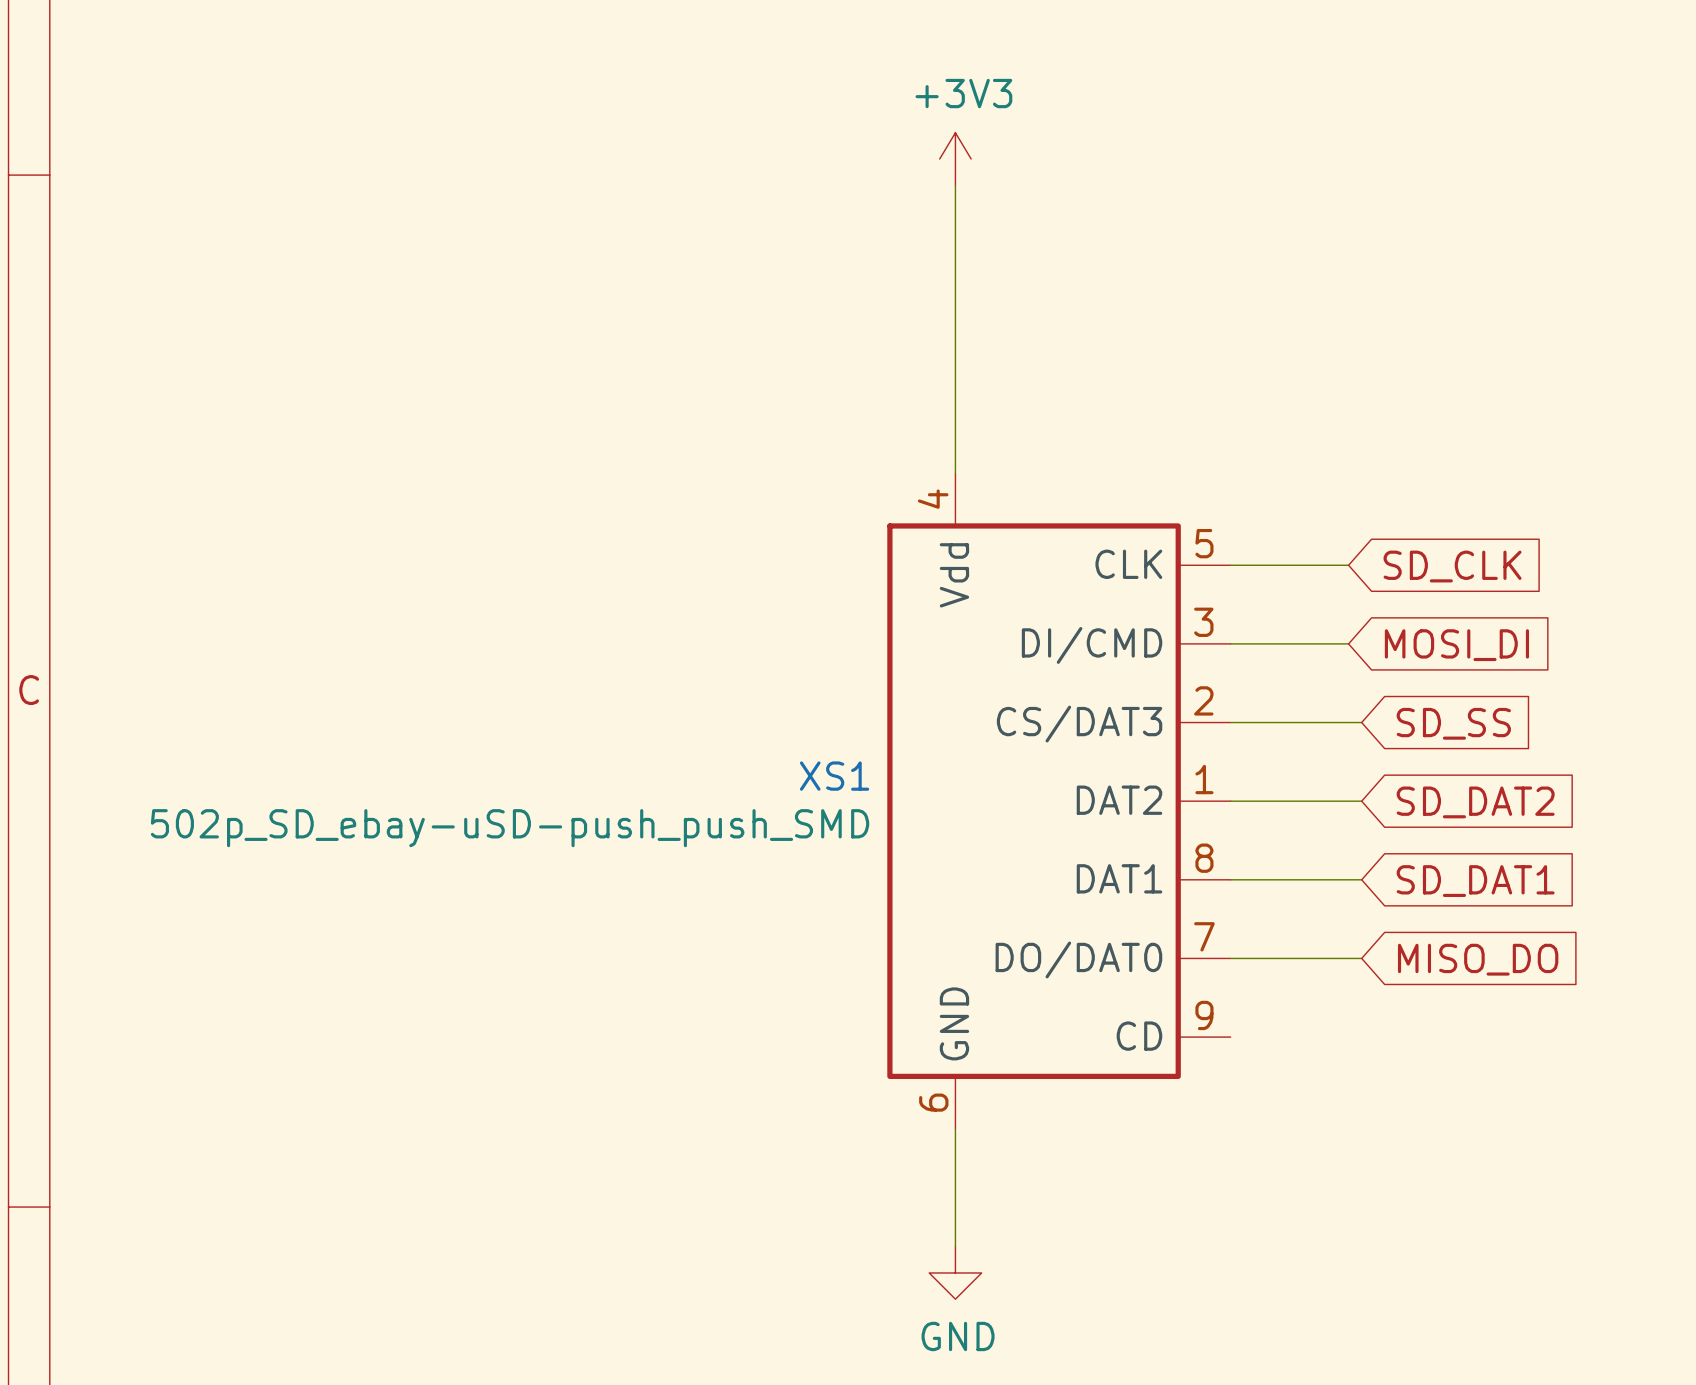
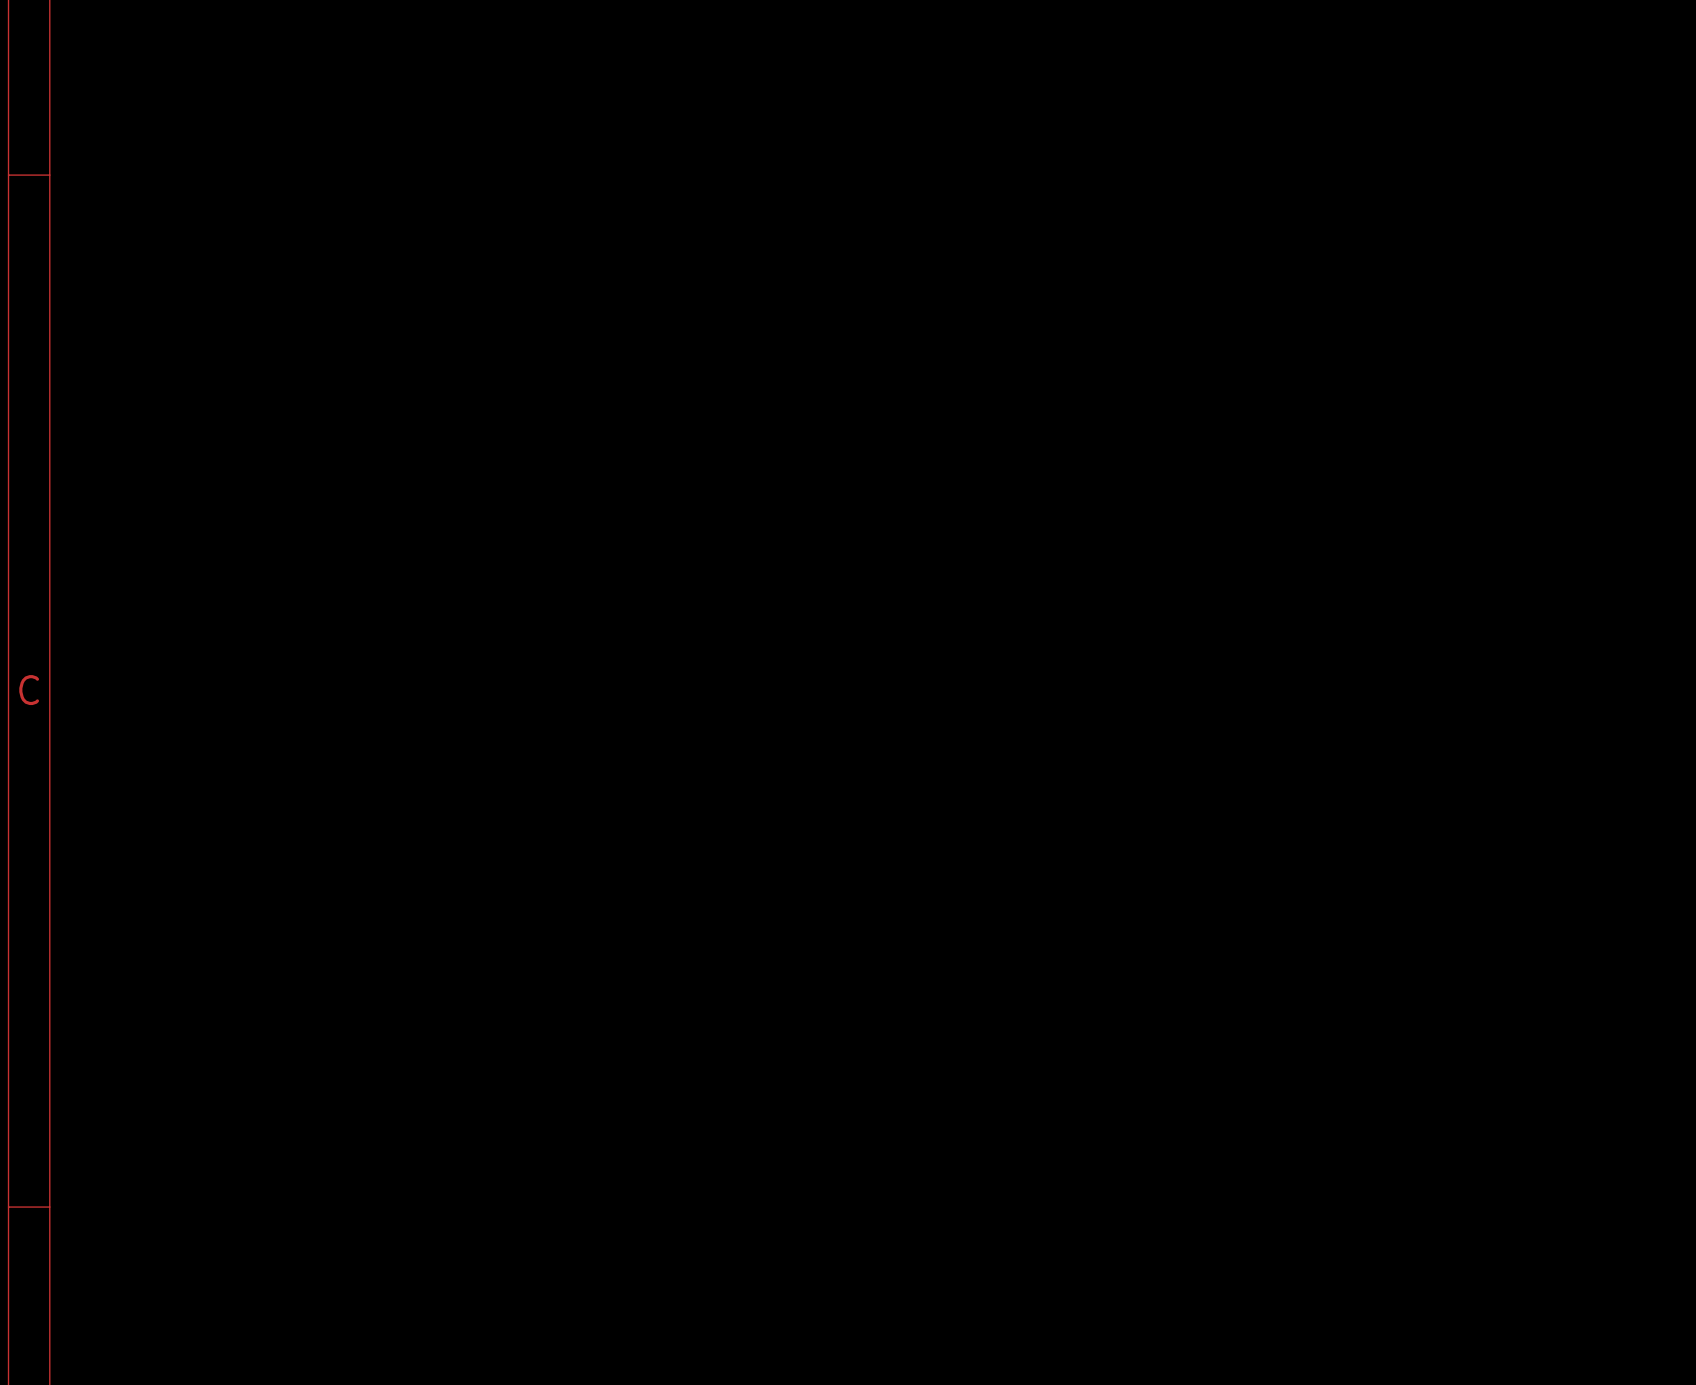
power symbol: +3V3 (955, 158) -> none
wire: (955, 185) (955, 473) -> none
wire: (1230, 565) (1348, 565) -> none
global label: SD_CLK (1452, 566) -> none
wire: (1230, 643) (1348, 643) -> none
global label: MOSI_DI (1456, 645) -> none
wire: (1230, 722) (1361, 722) -> none
global label: SD_SS (1453, 723) -> none
XS1: 502p_SD_ebay-uSD-push_push_SMD (1058, 801) -> none
wire: (1230, 801) (1361, 801) -> none
global label: SD_DAT2 (1475, 802) -> none
wire: (1230, 879) (1361, 879) -> none
global label: SD_DAT1 (1475, 881) -> none
wire: (1230, 958) (1361, 958) -> none
global label: MISO_DO (1478, 959) -> none
wire: (955, 1128) (955, 1246) -> none
power symbol: GND (955, 1272) -> none

